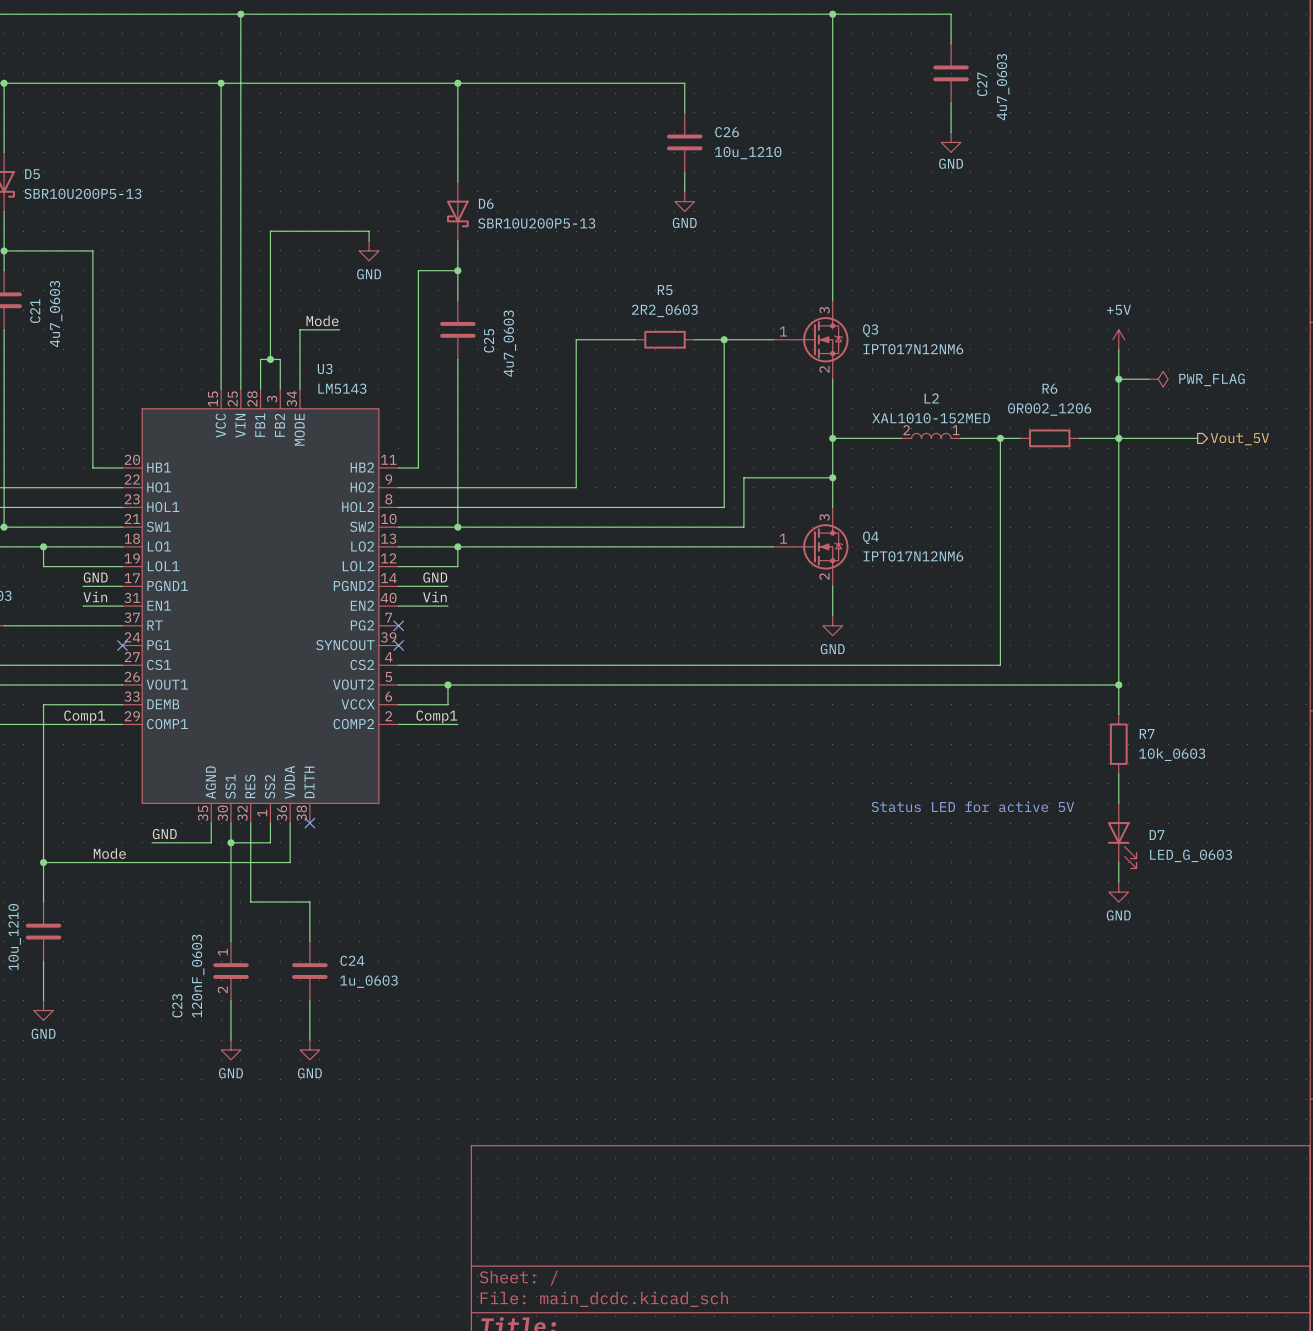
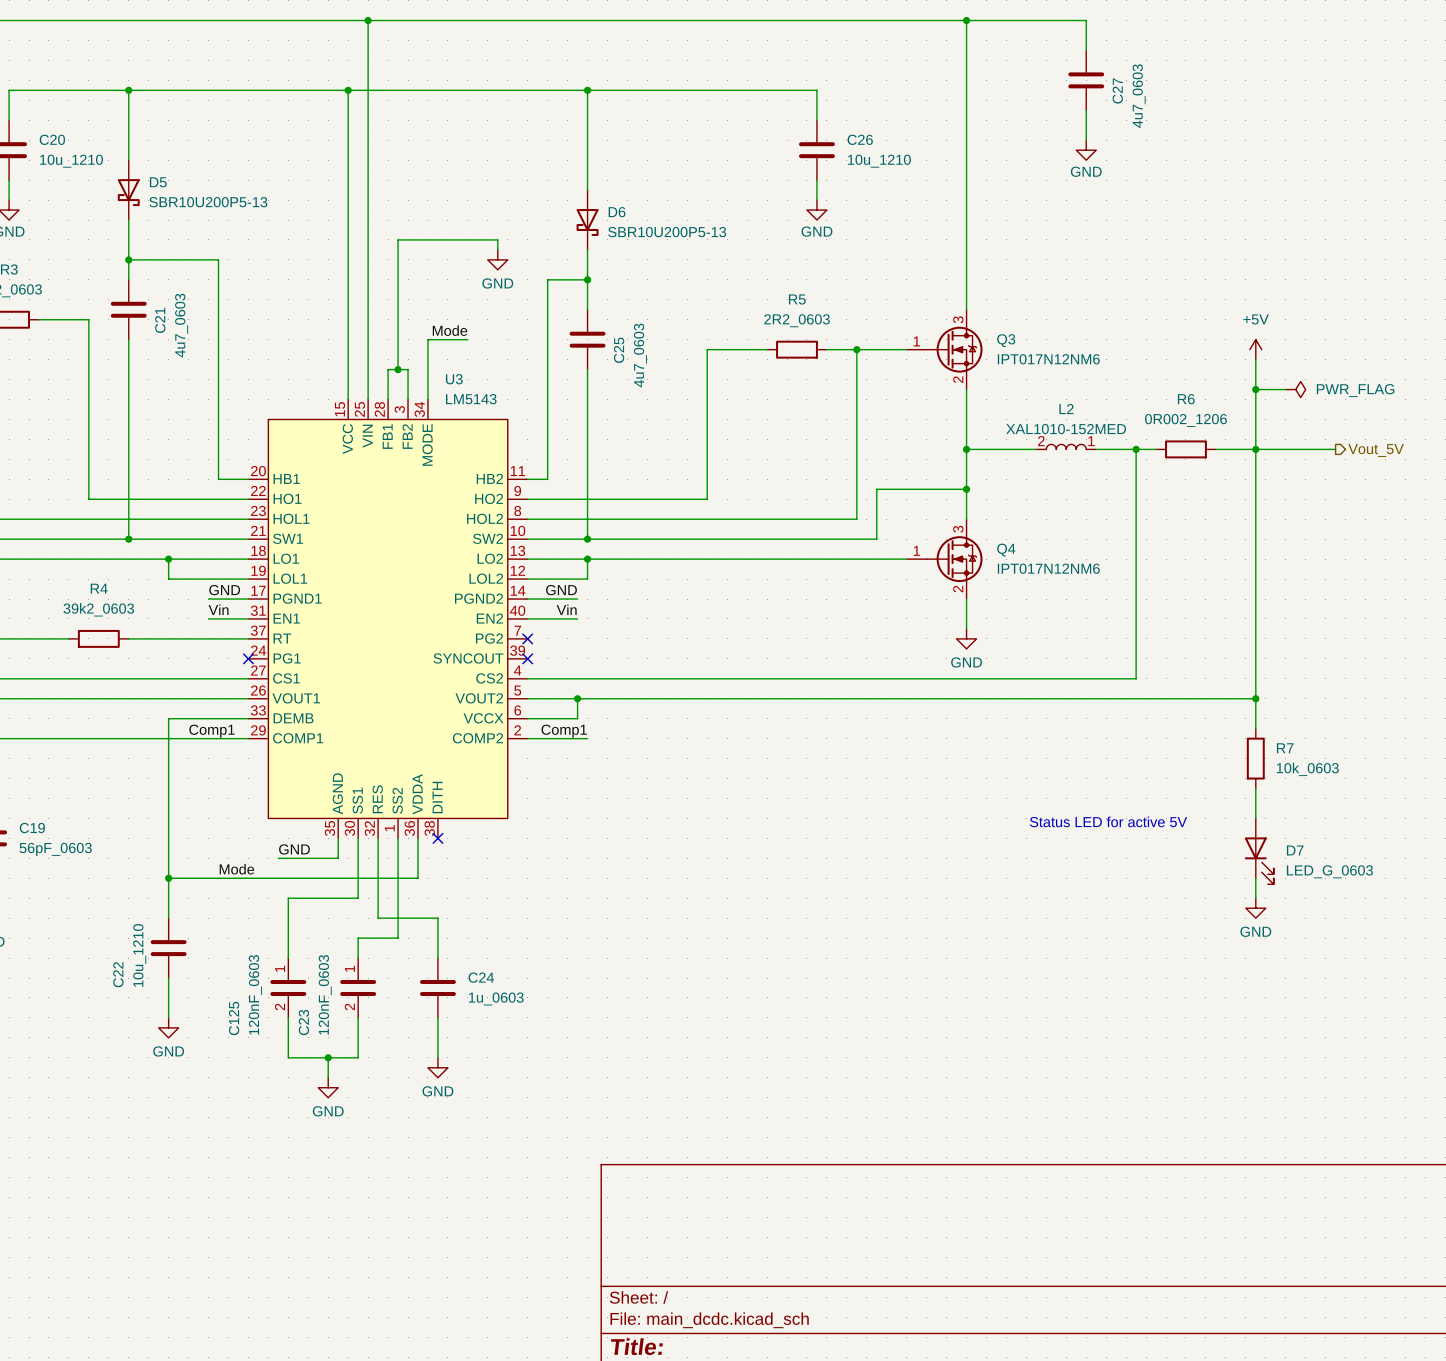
wire: (230, 842) (270, 842) -> none
junction: (230, 842) -> none
wire: (230, 882) (230, 921) -> (398, 858) (398, 938) (358, 938)
wire: none -> (358, 898) (288, 898) (288, 958)
C125: none -> 120nF_0603 (288, 987)
wire: none -> (288, 1017) (288, 1057) (358, 1057)
wire: none -> (328, 1057) (328, 1077)
junction: none -> (328, 1057)
power symbol position: GND (230, 1049) -> GND (328, 1087)

